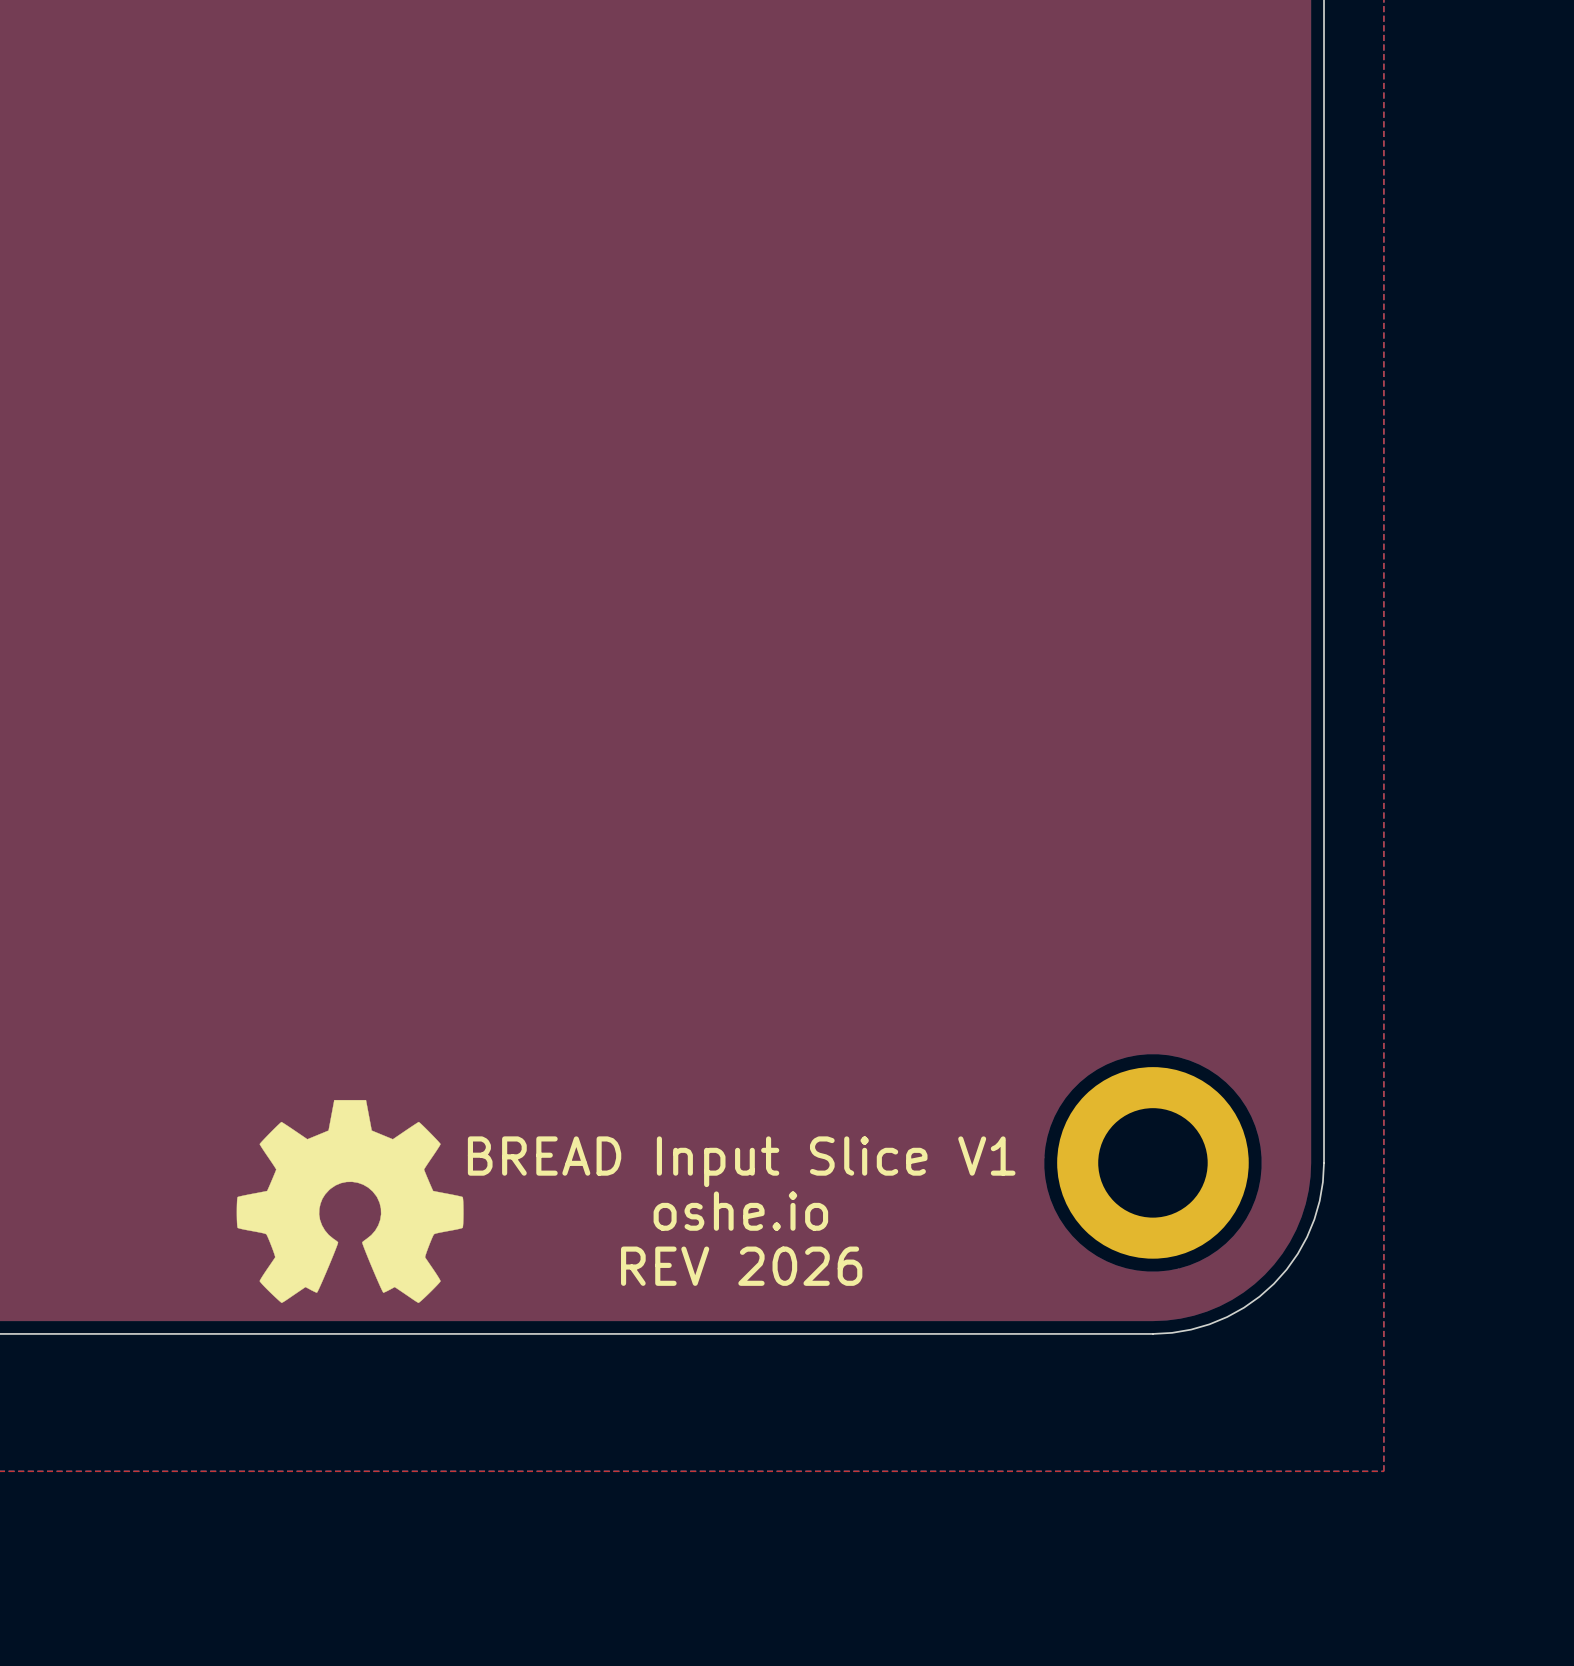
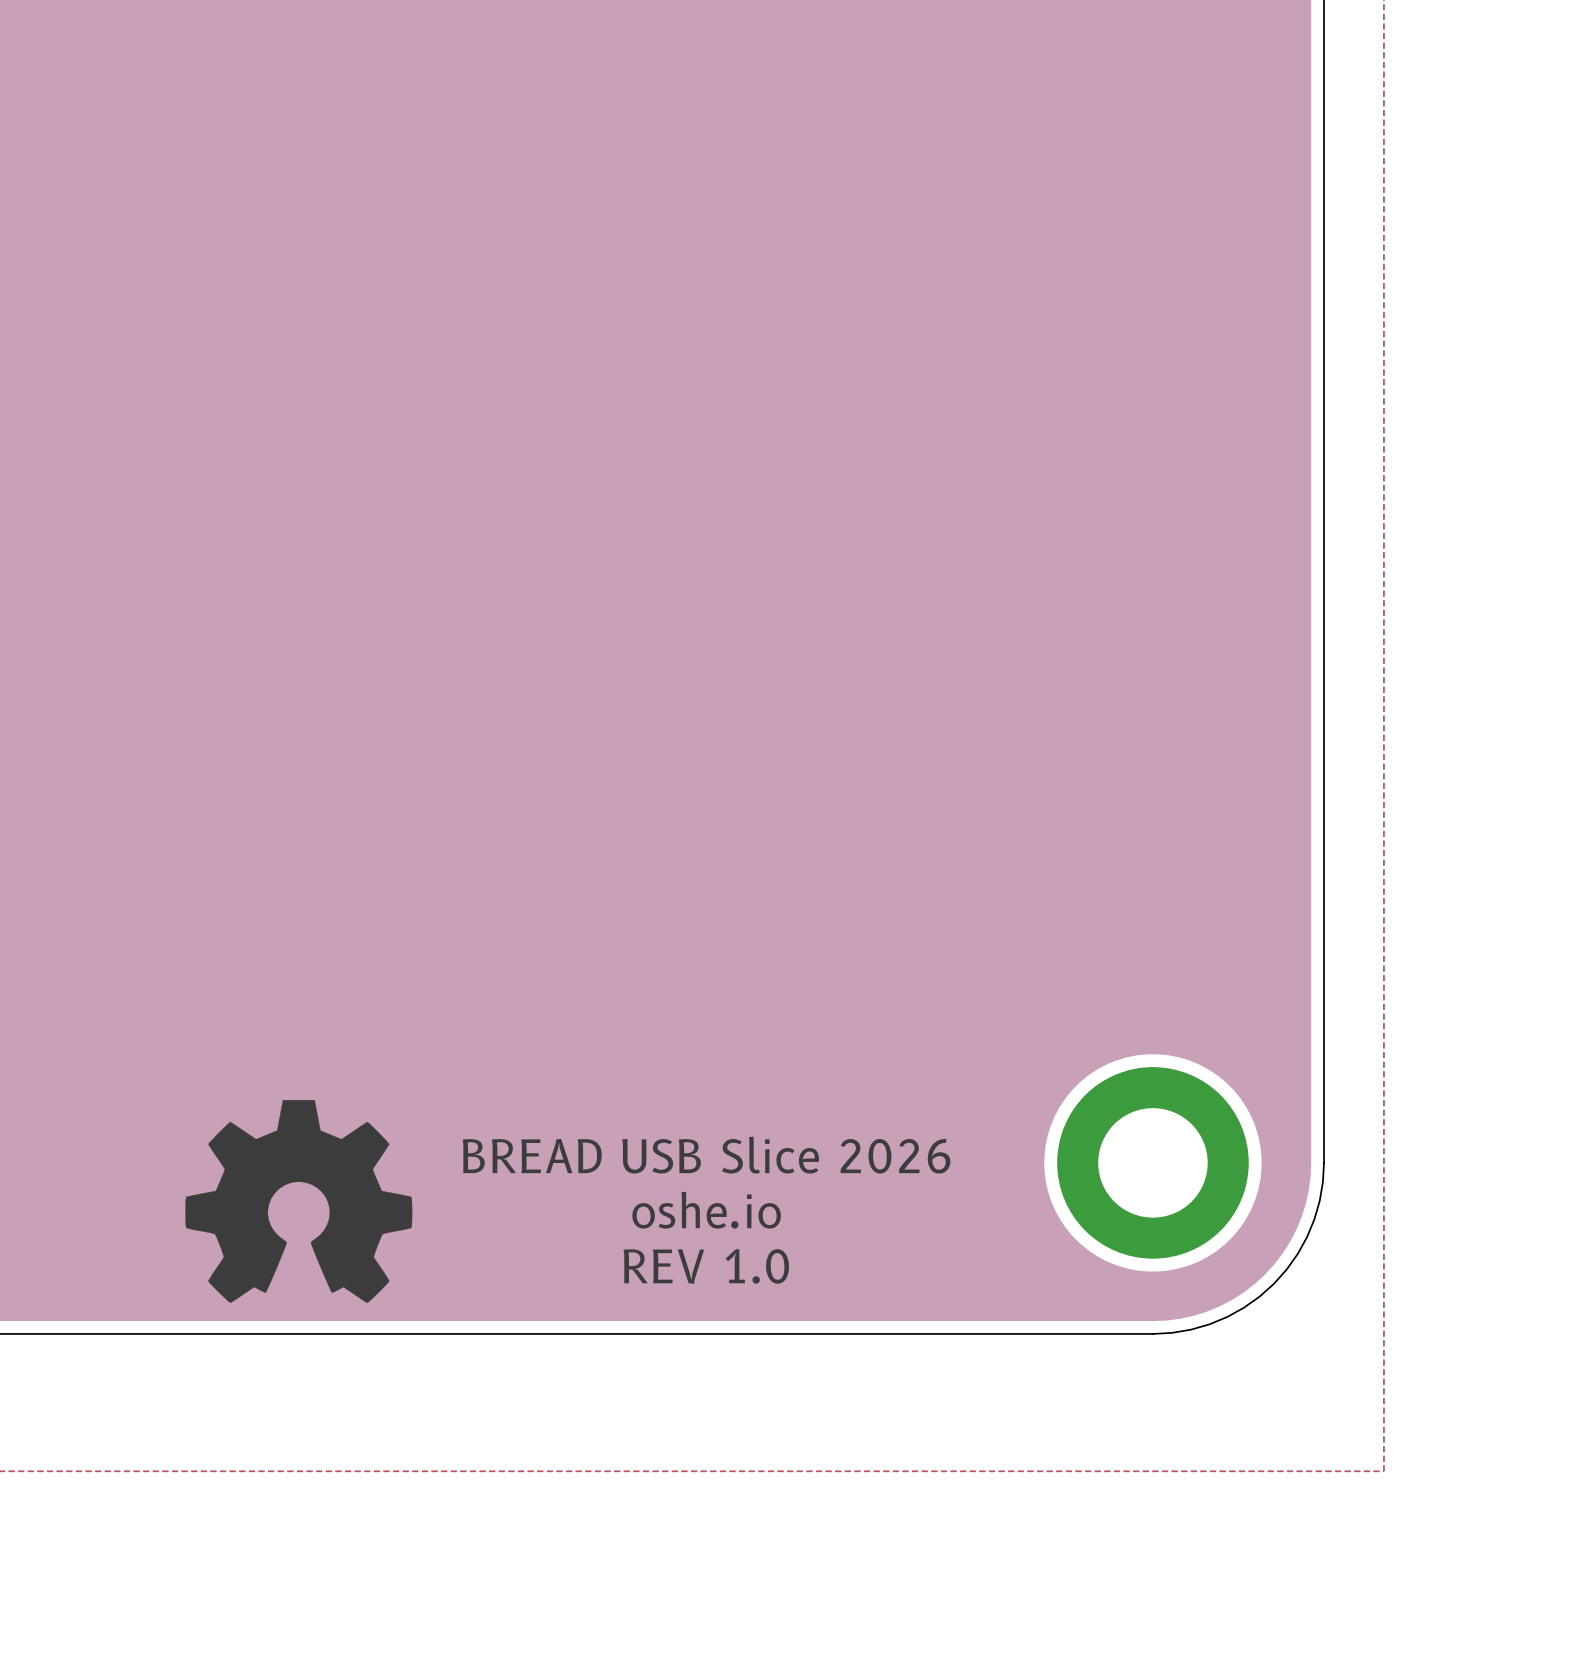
text: BREAD Input Slice V1 (741, 1161) -> BREAD USB Slice 2026 (706, 1155)
drawing position: (350, 1201) -> (298, 1201)
text position: oshe.io (740, 1211) -> oshe.io (706, 1210)
text: REV 2026 (741, 1266) -> REV 1.0 (706, 1266)

